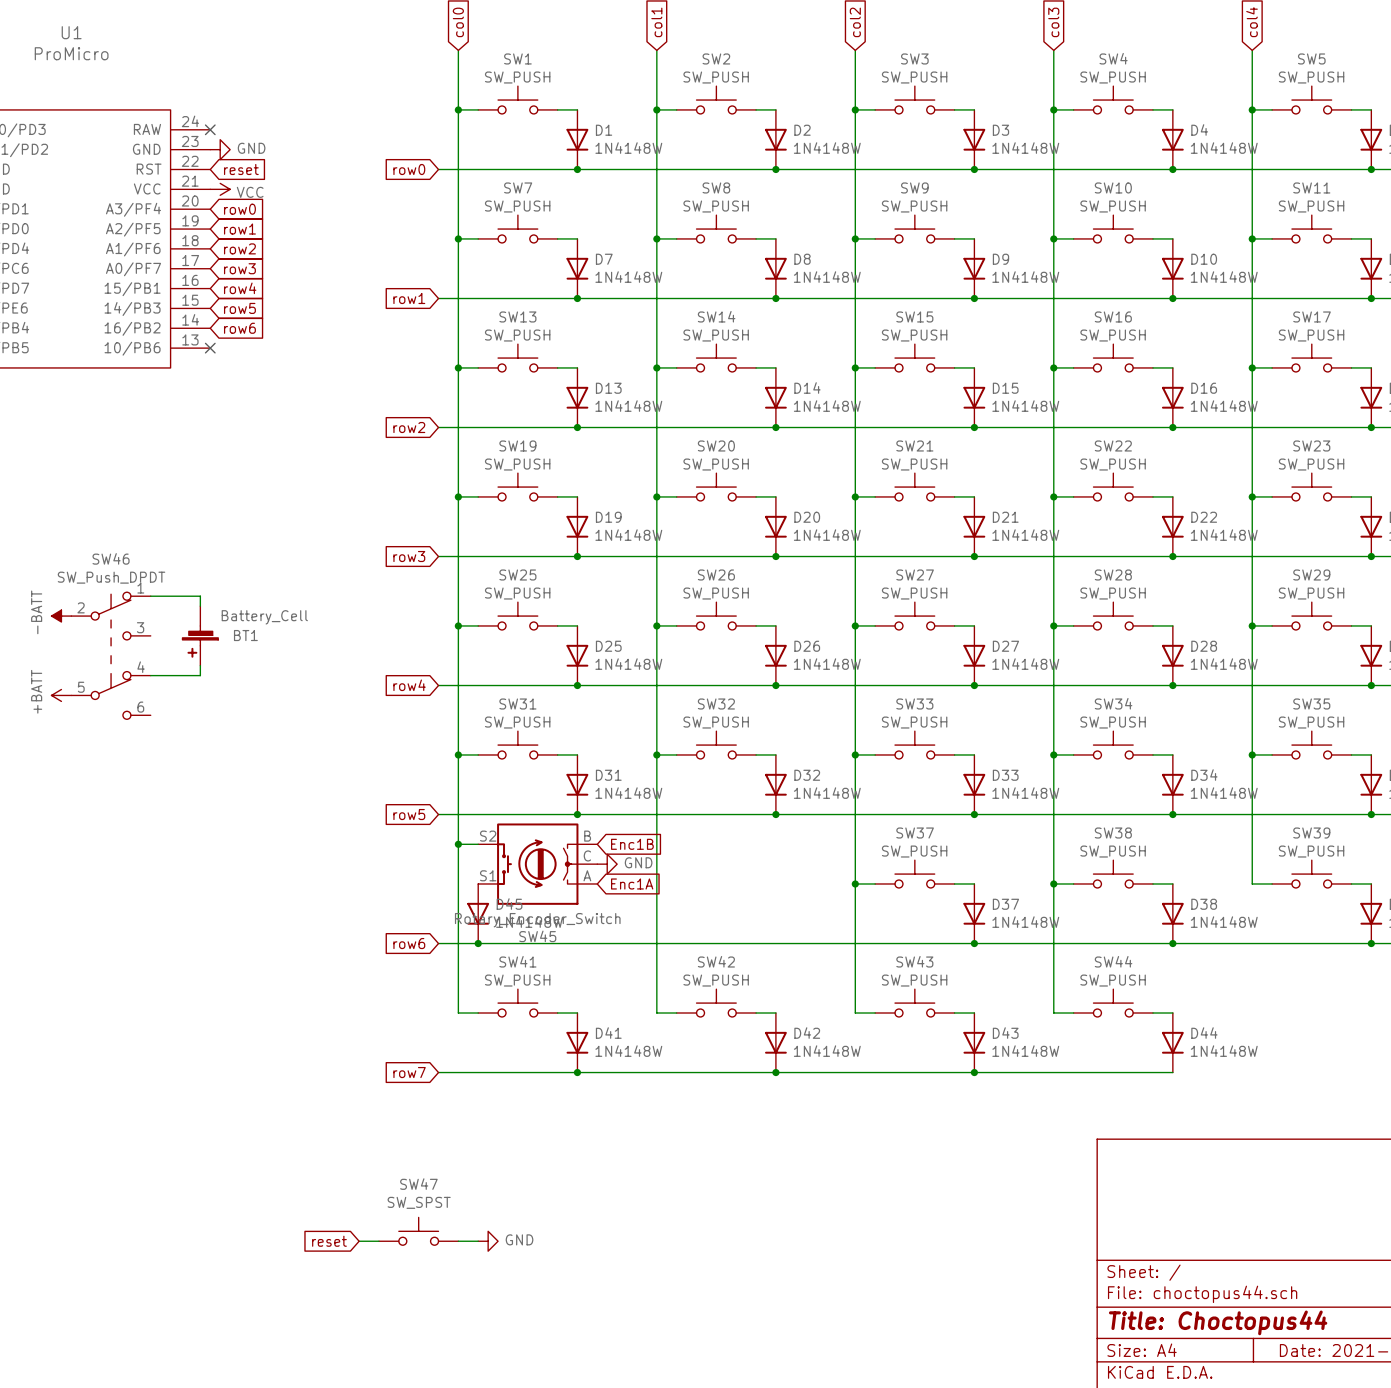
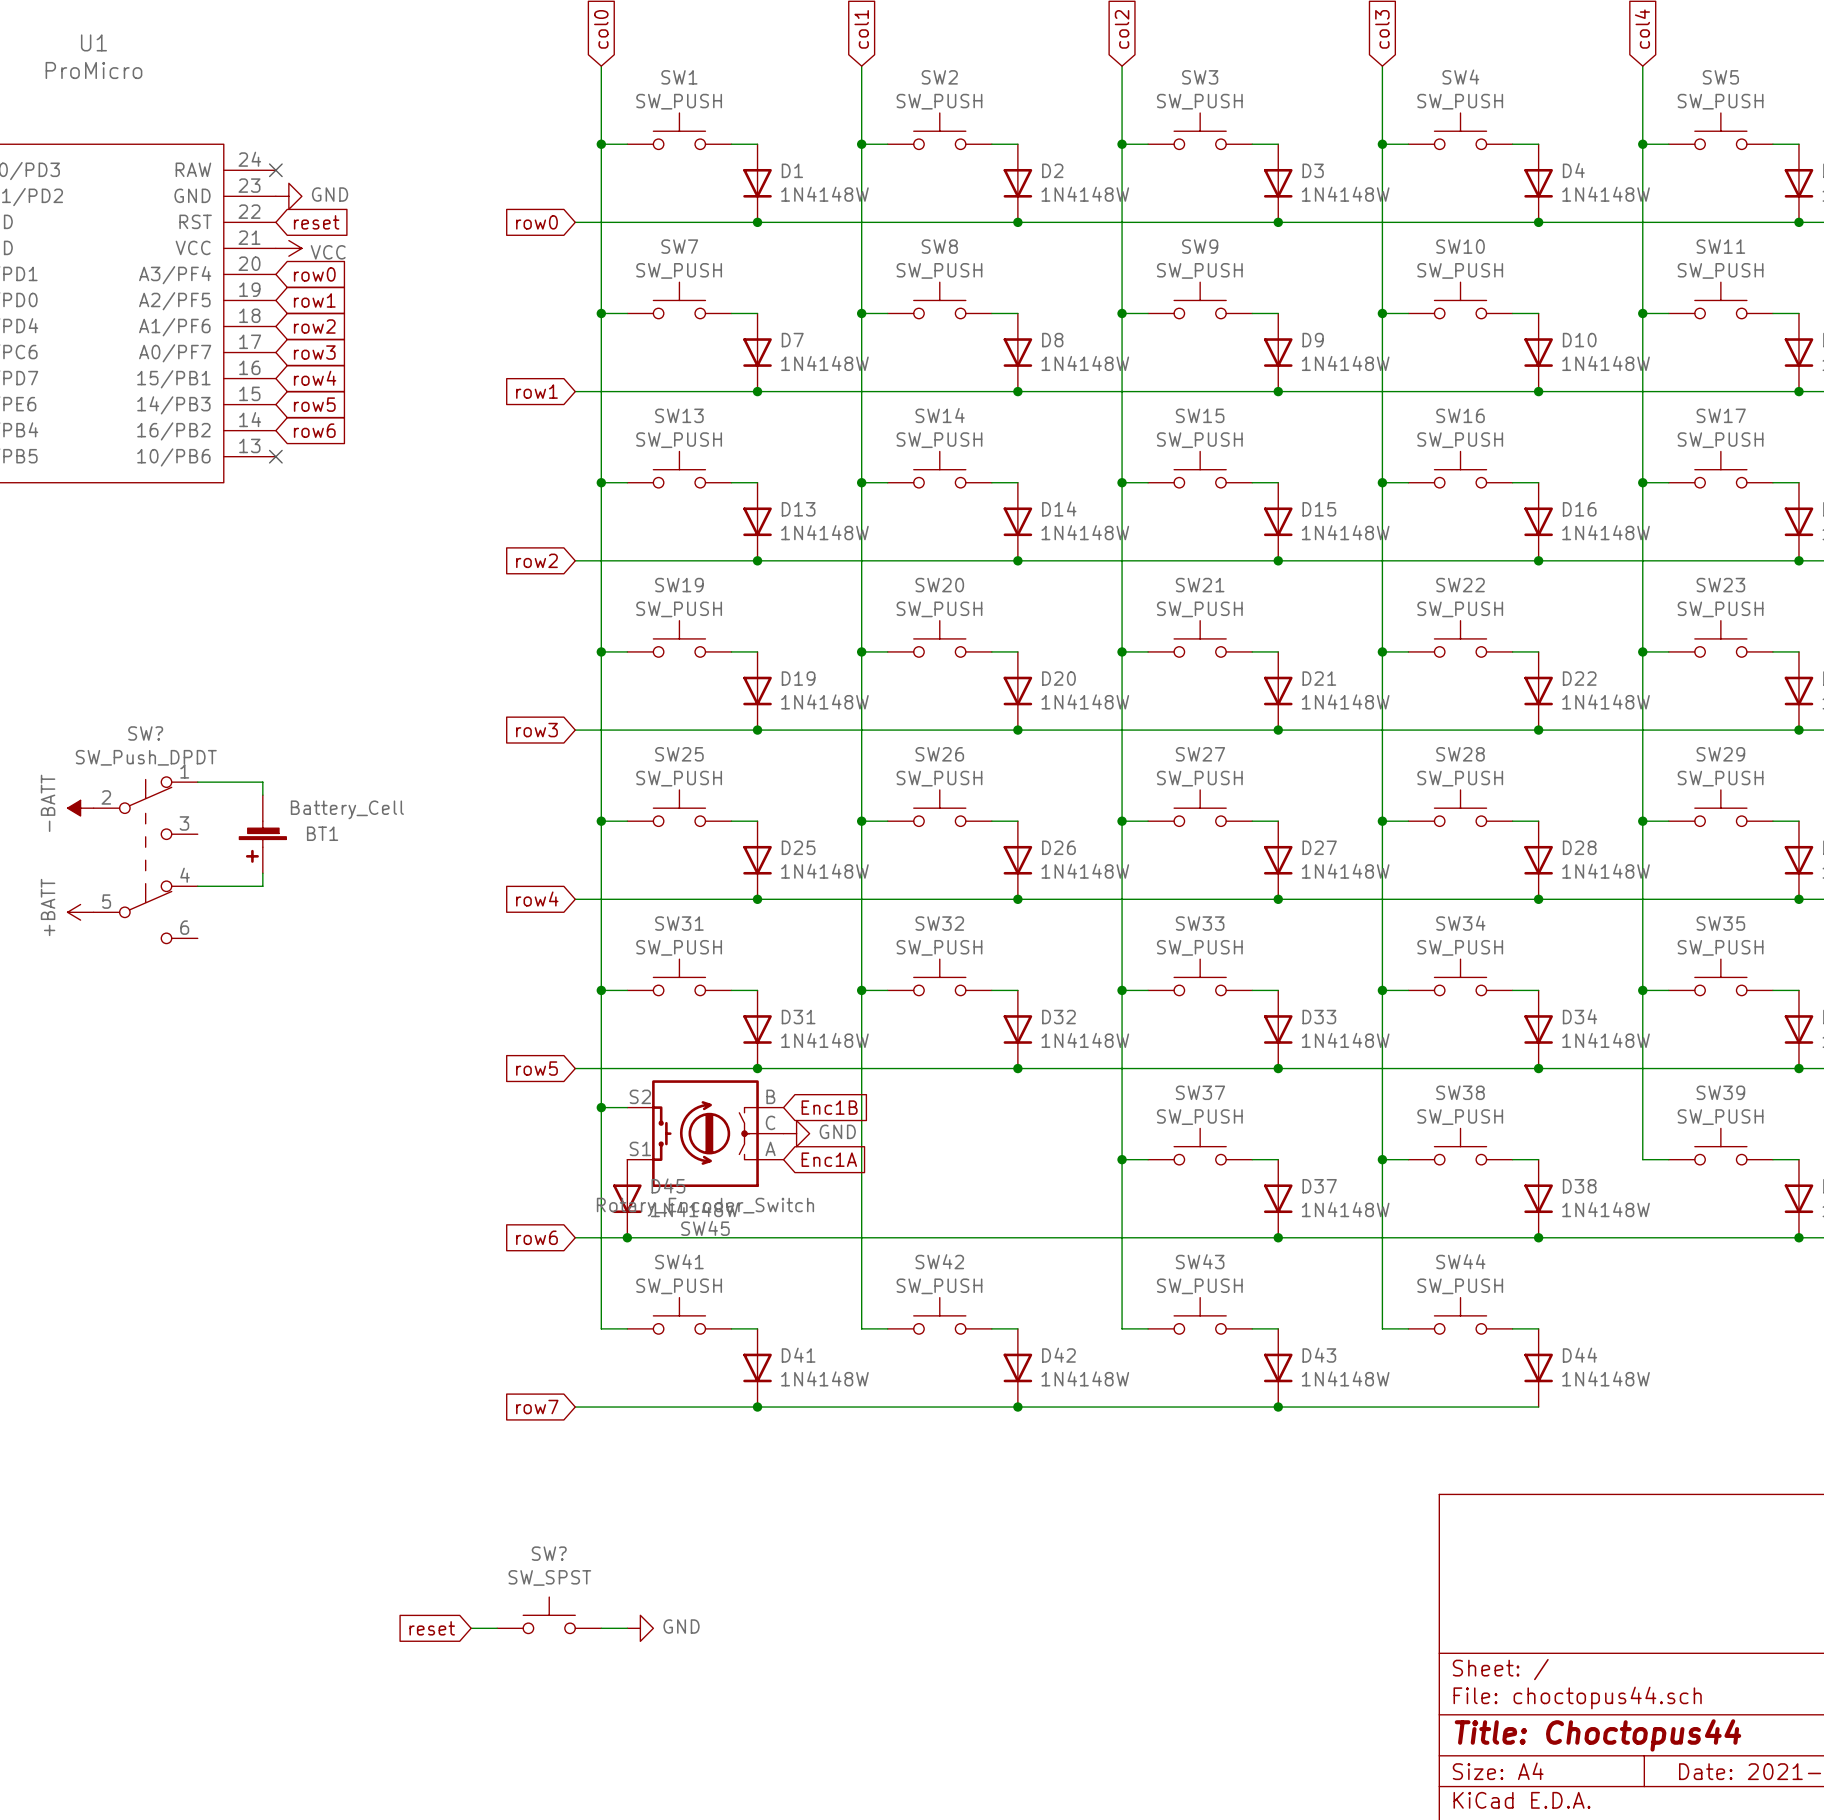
SW46 name: SW46 (111, 558) -> SW? (145, 733)
SW47 name: SW47 (418, 1184) -> SW? (549, 1553)

